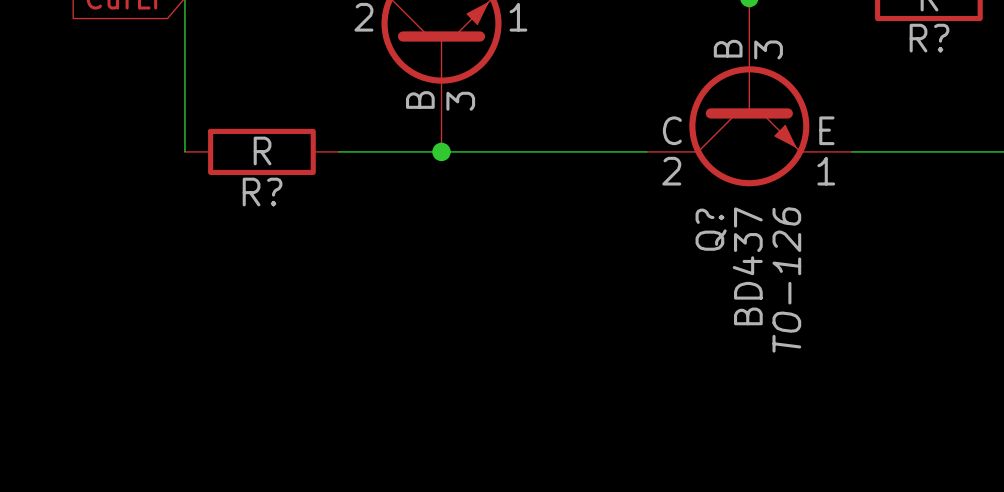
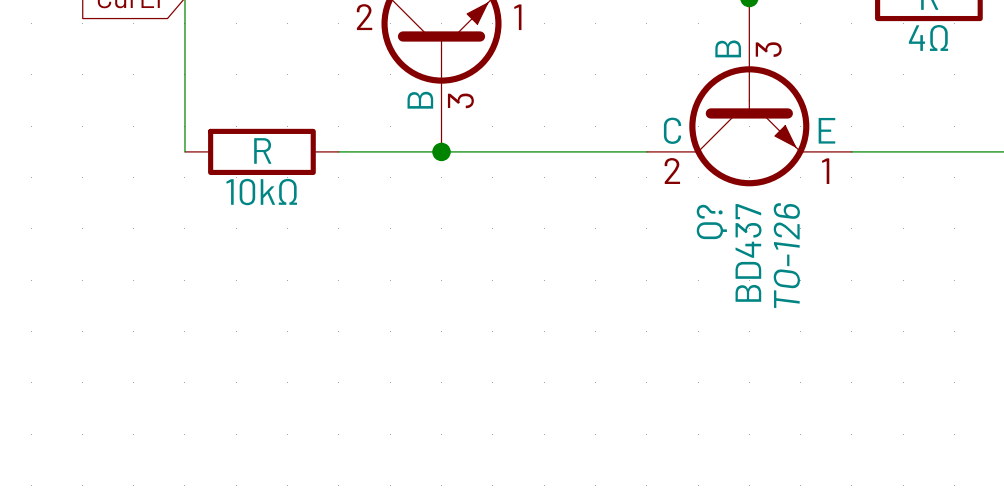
R? name: R? (929, 38) -> 4Ω (928, 37)
R? name: R? (262, 192) -> 10kΩ (261, 192)

